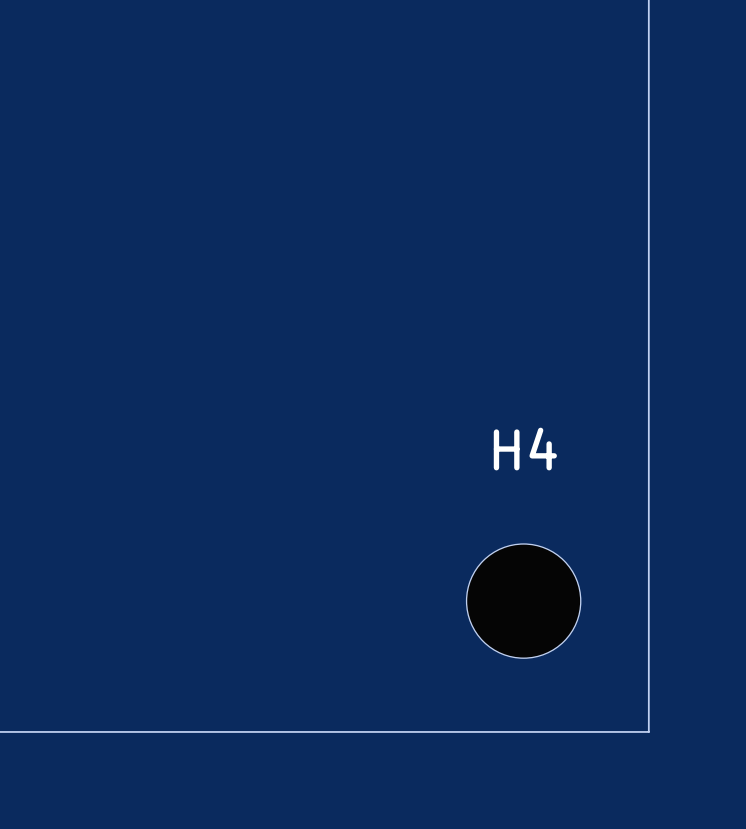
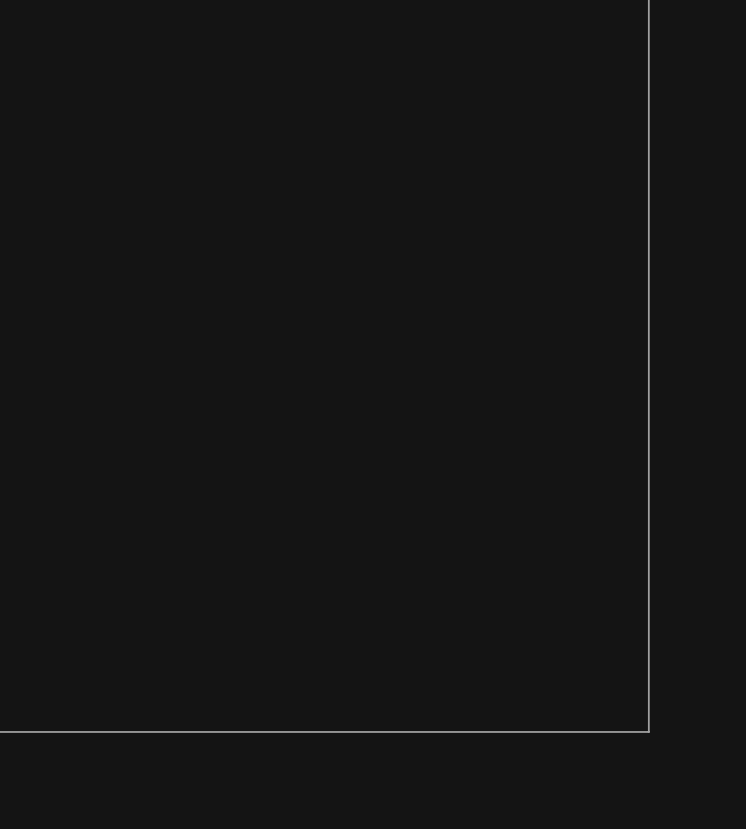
H4: (523, 601) -> none

